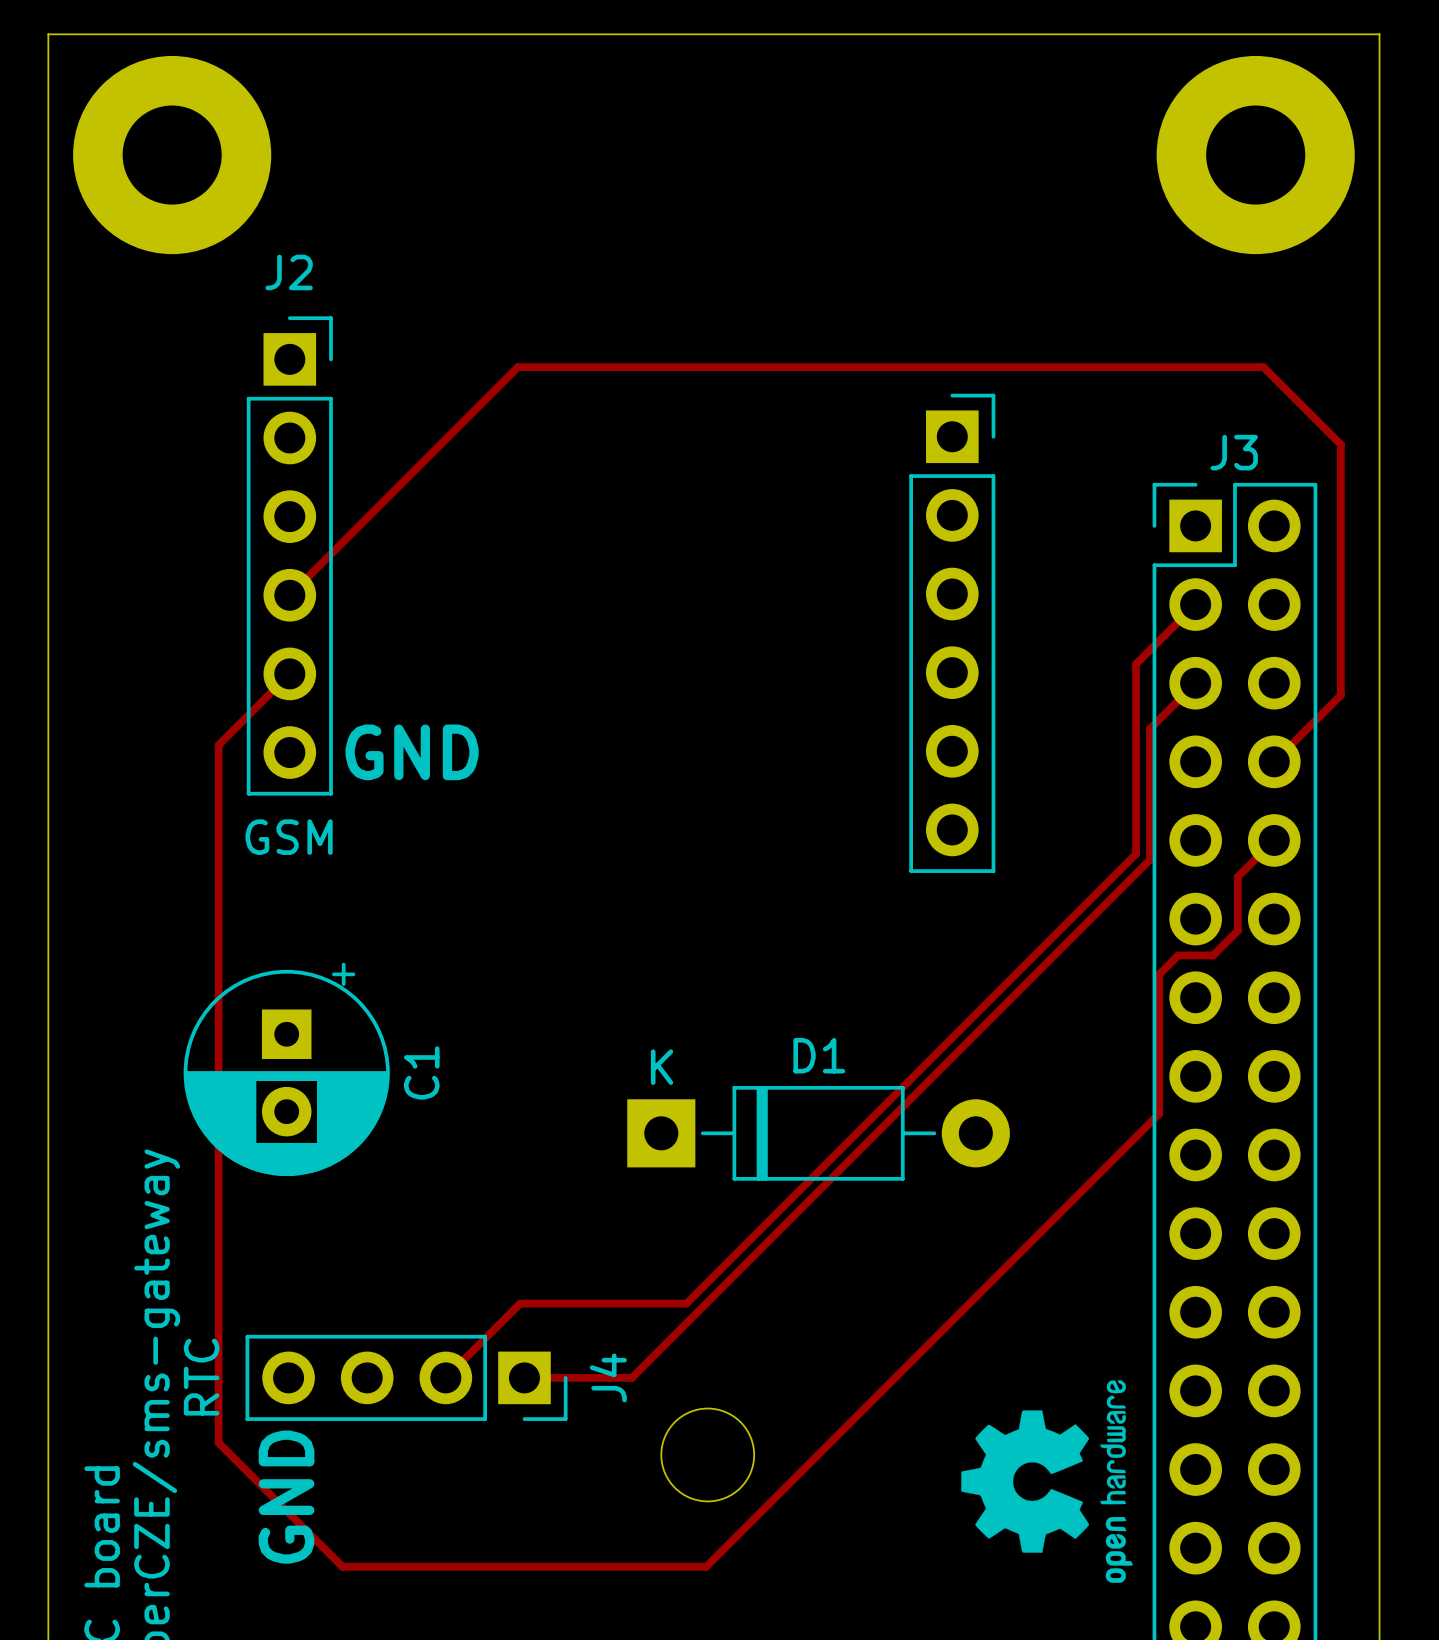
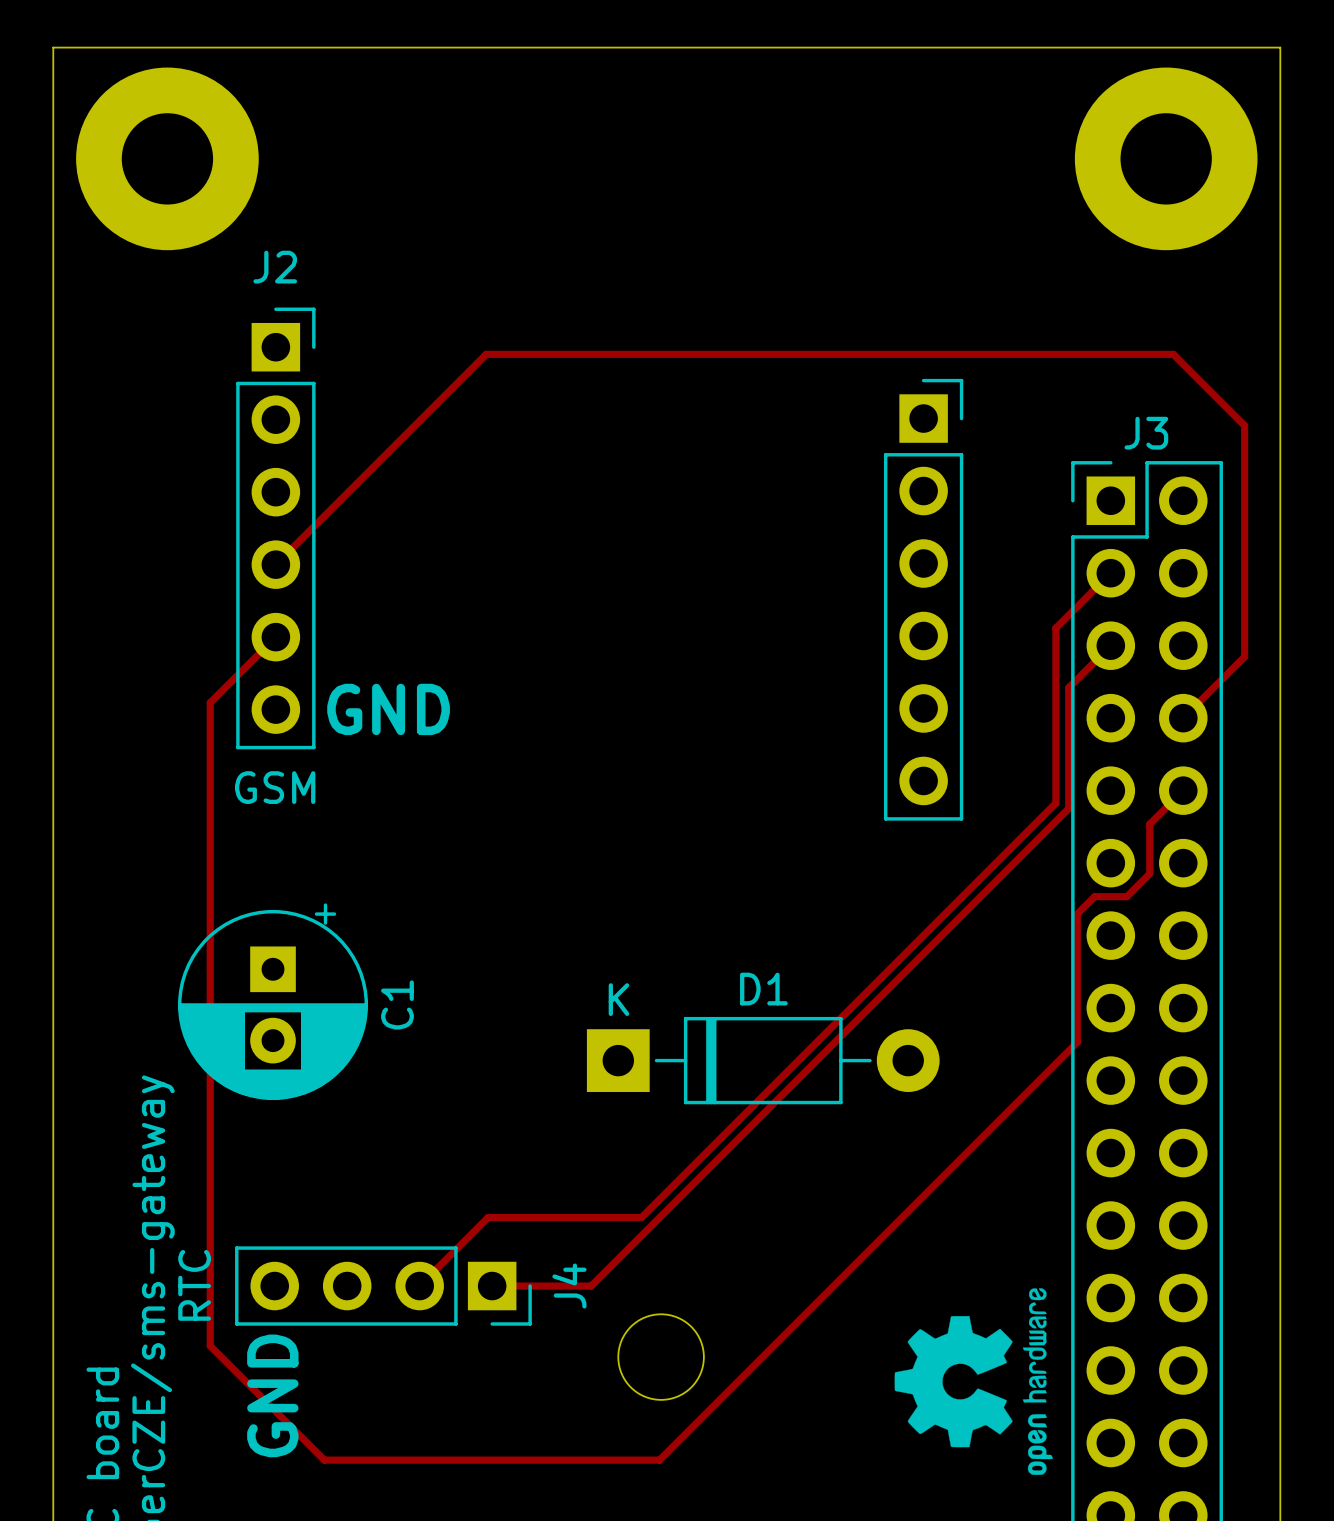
part position: (952, 633) -> (923, 599)

